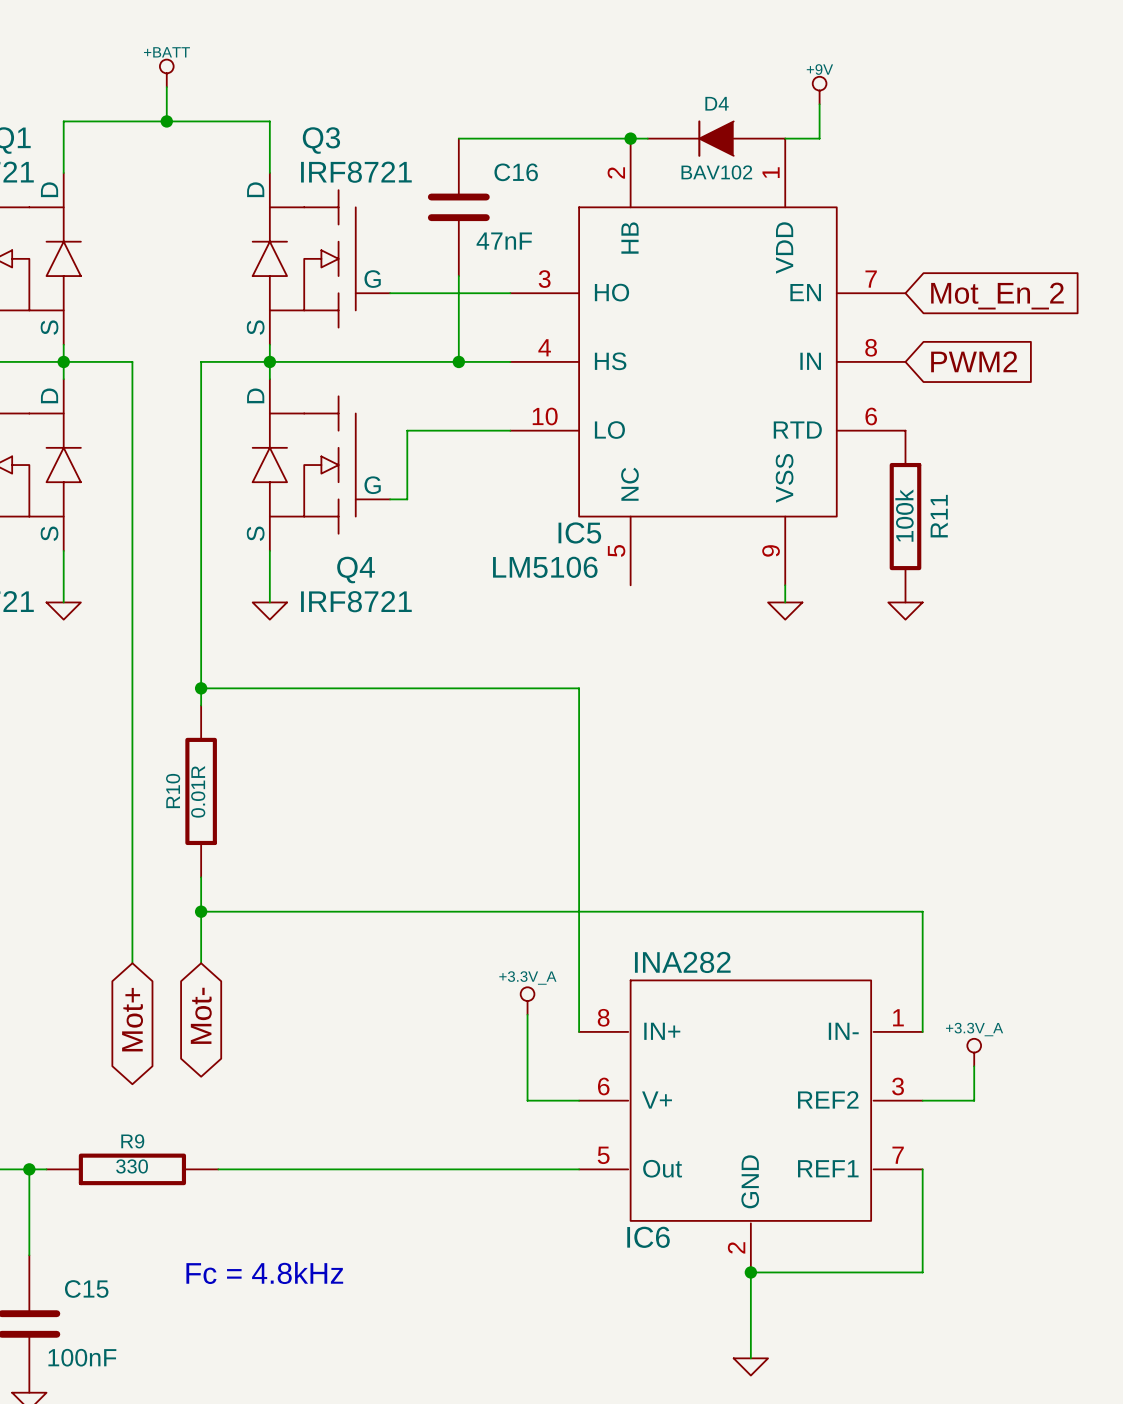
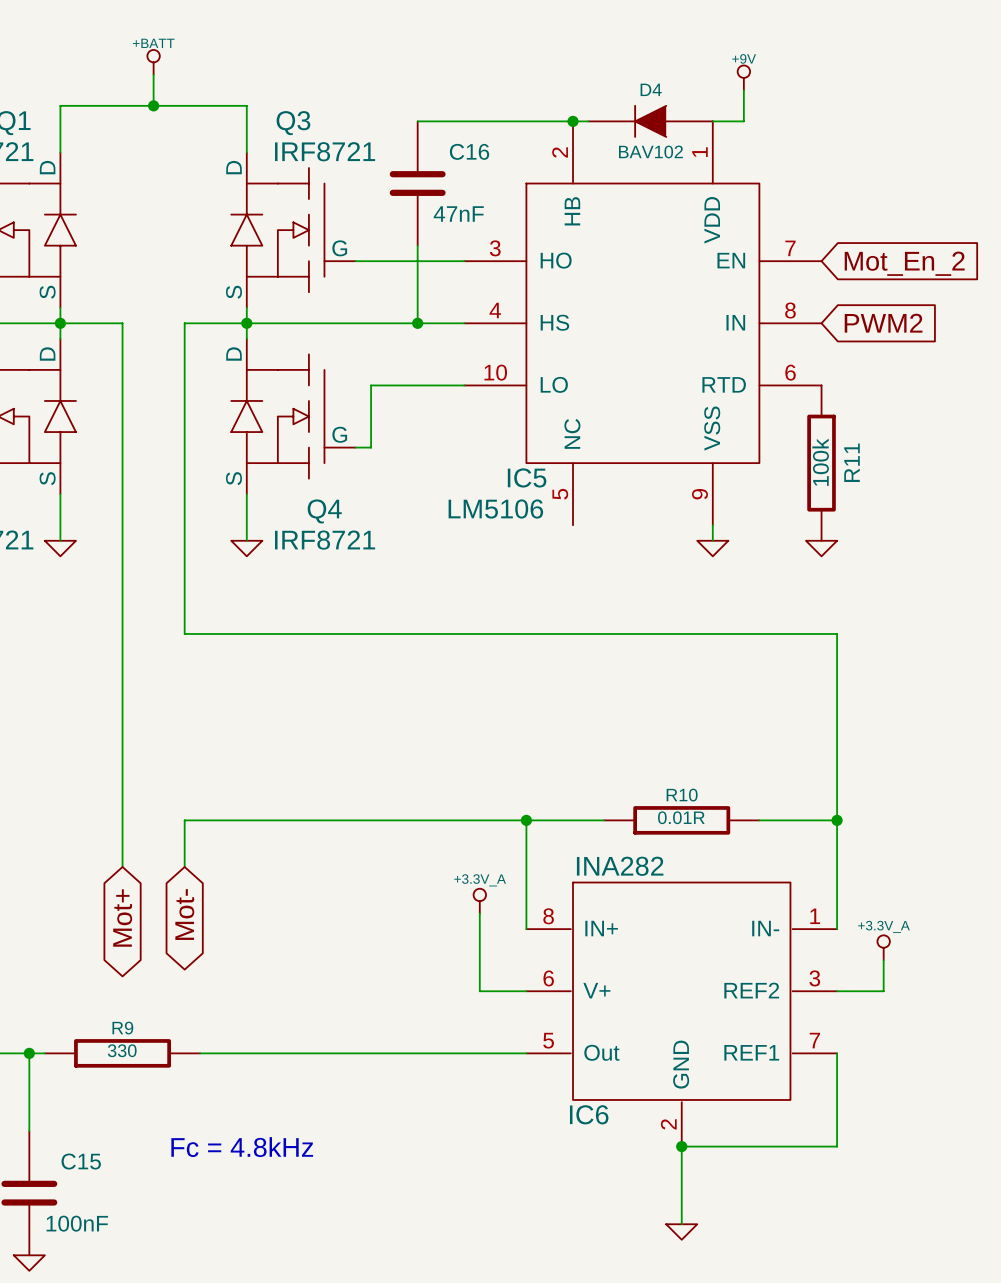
wire: (201, 688) (579, 688) (579, 911) -> none
junction: (201, 688) -> none
wire: none -> (184, 633) (837, 633) (837, 820)
R10 rotation: 0° (201, 791) -> 90° clockwise (681, 820)
R10 position: (201, 791) -> (681, 820)
wire: (201, 877) (201, 911) -> none
junction: (201, 911) -> none
junction: none -> (526, 820)
wire: (664, 911) (836, 911) -> none
junction: none -> (837, 820)

